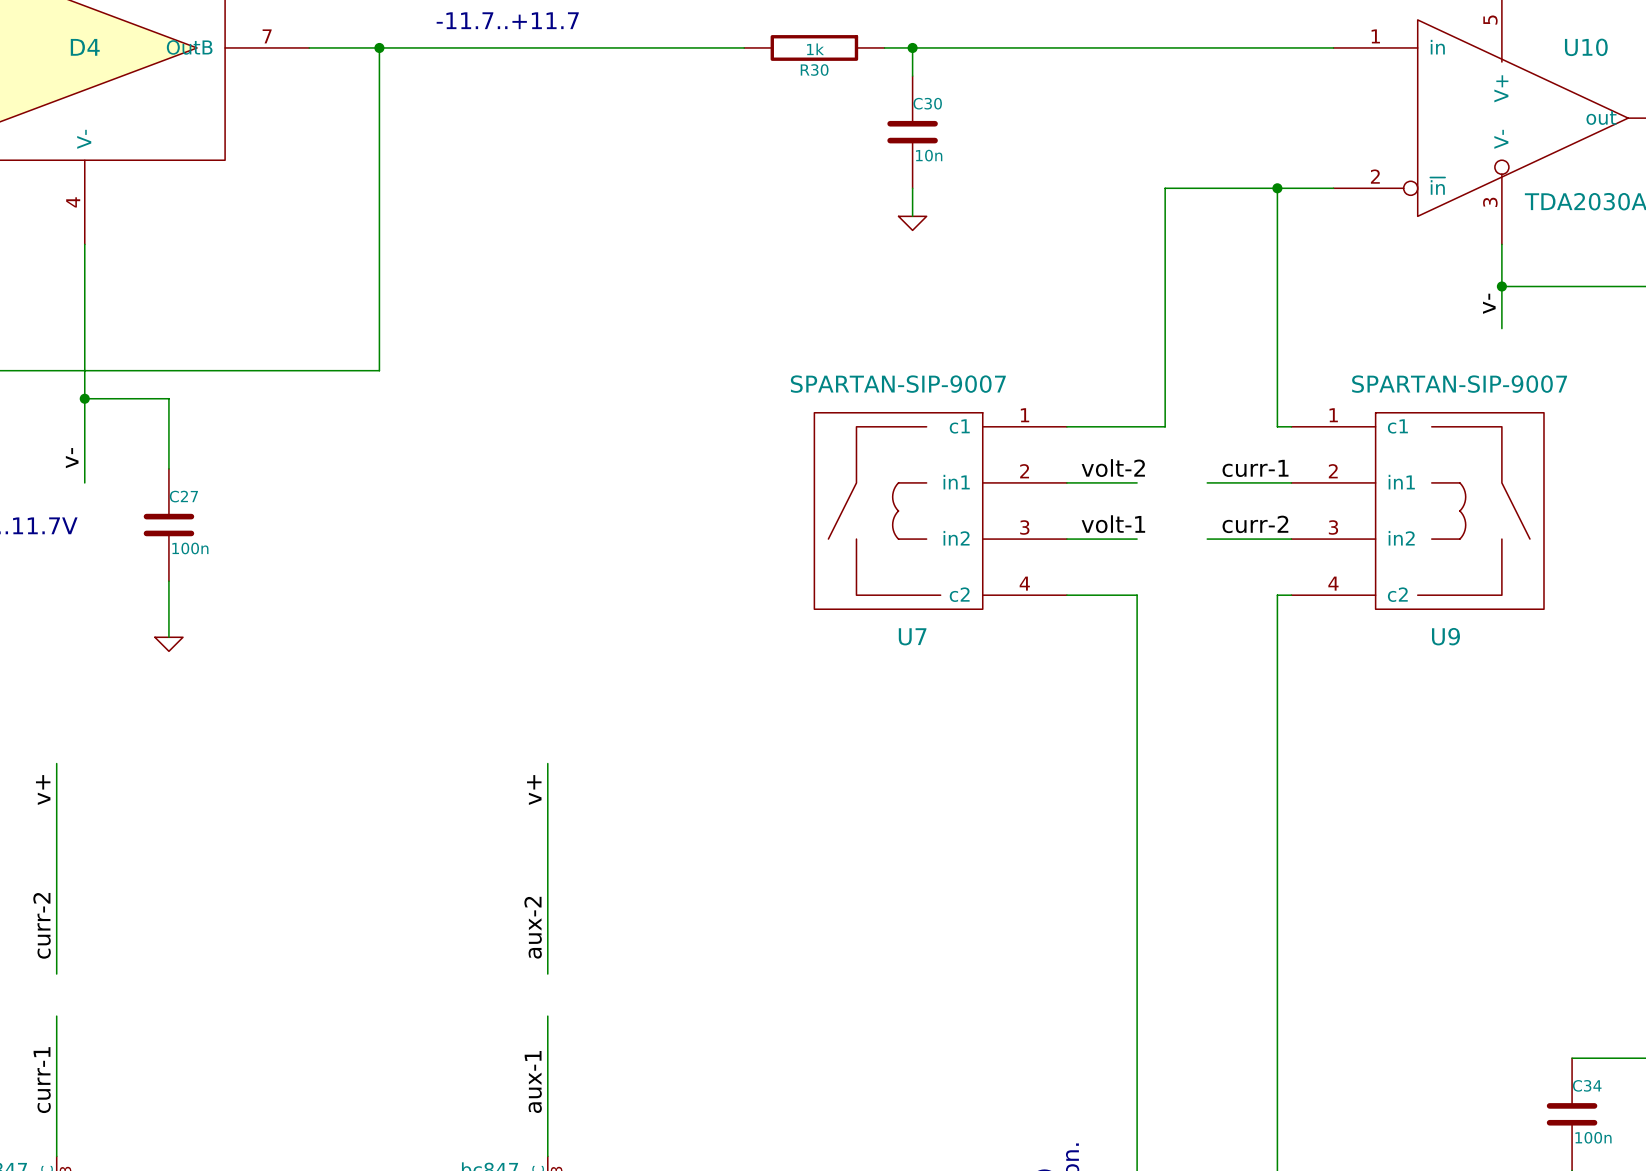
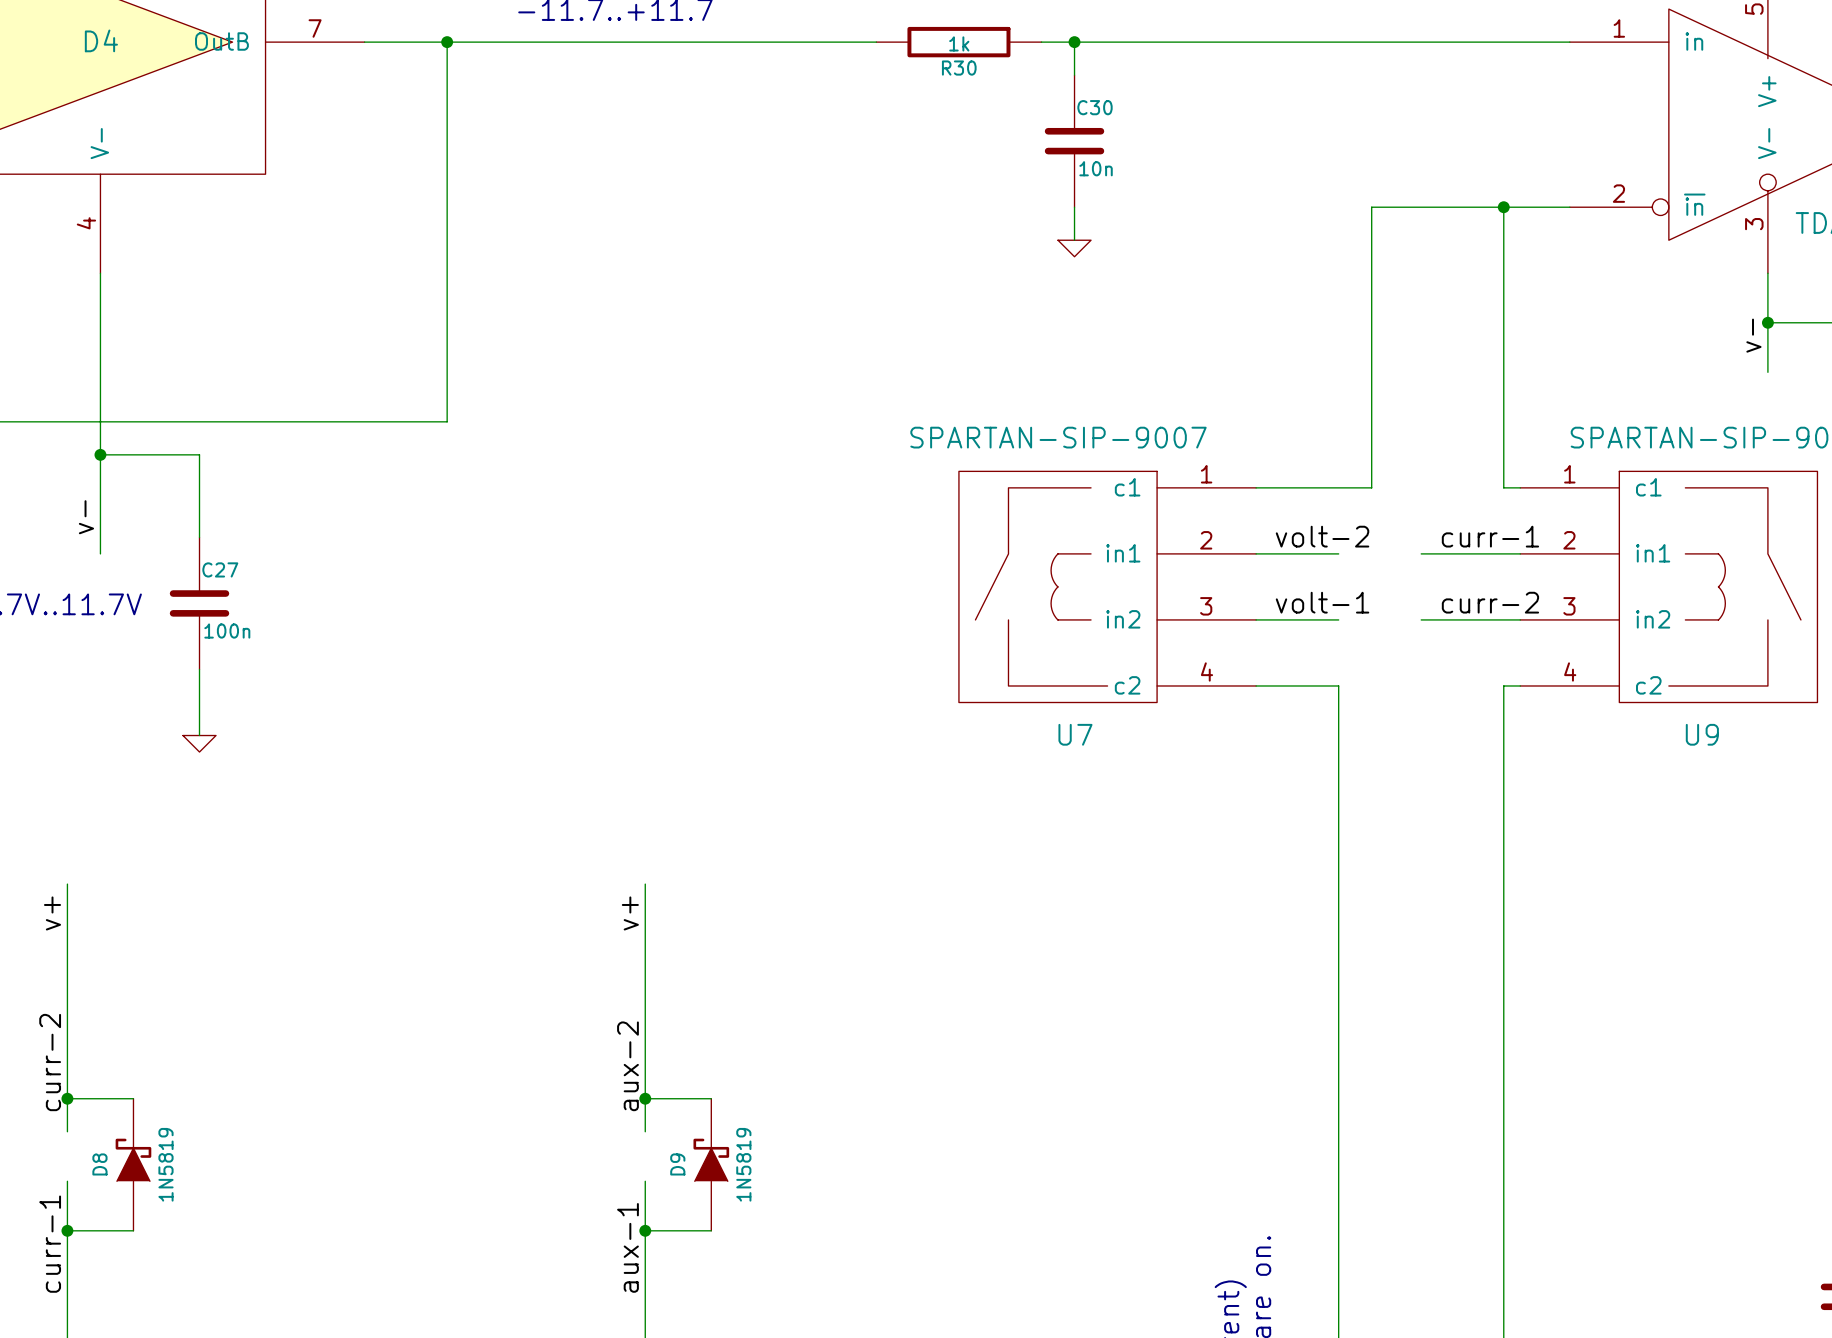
wire: none -> (67, 1098) (133, 1098)
junction: none -> (67, 1098)
wire: none -> (645, 1098) (711, 1098)
junction: none -> (645, 1098)
D8: none -> 1N5819 (133, 1164)
D9: none -> 1N5819 (711, 1164)
wire: none -> (67, 1230) (133, 1230)
junction: none -> (67, 1230)
wire: none -> (645, 1230) (711, 1230)
junction: none -> (645, 1230)

